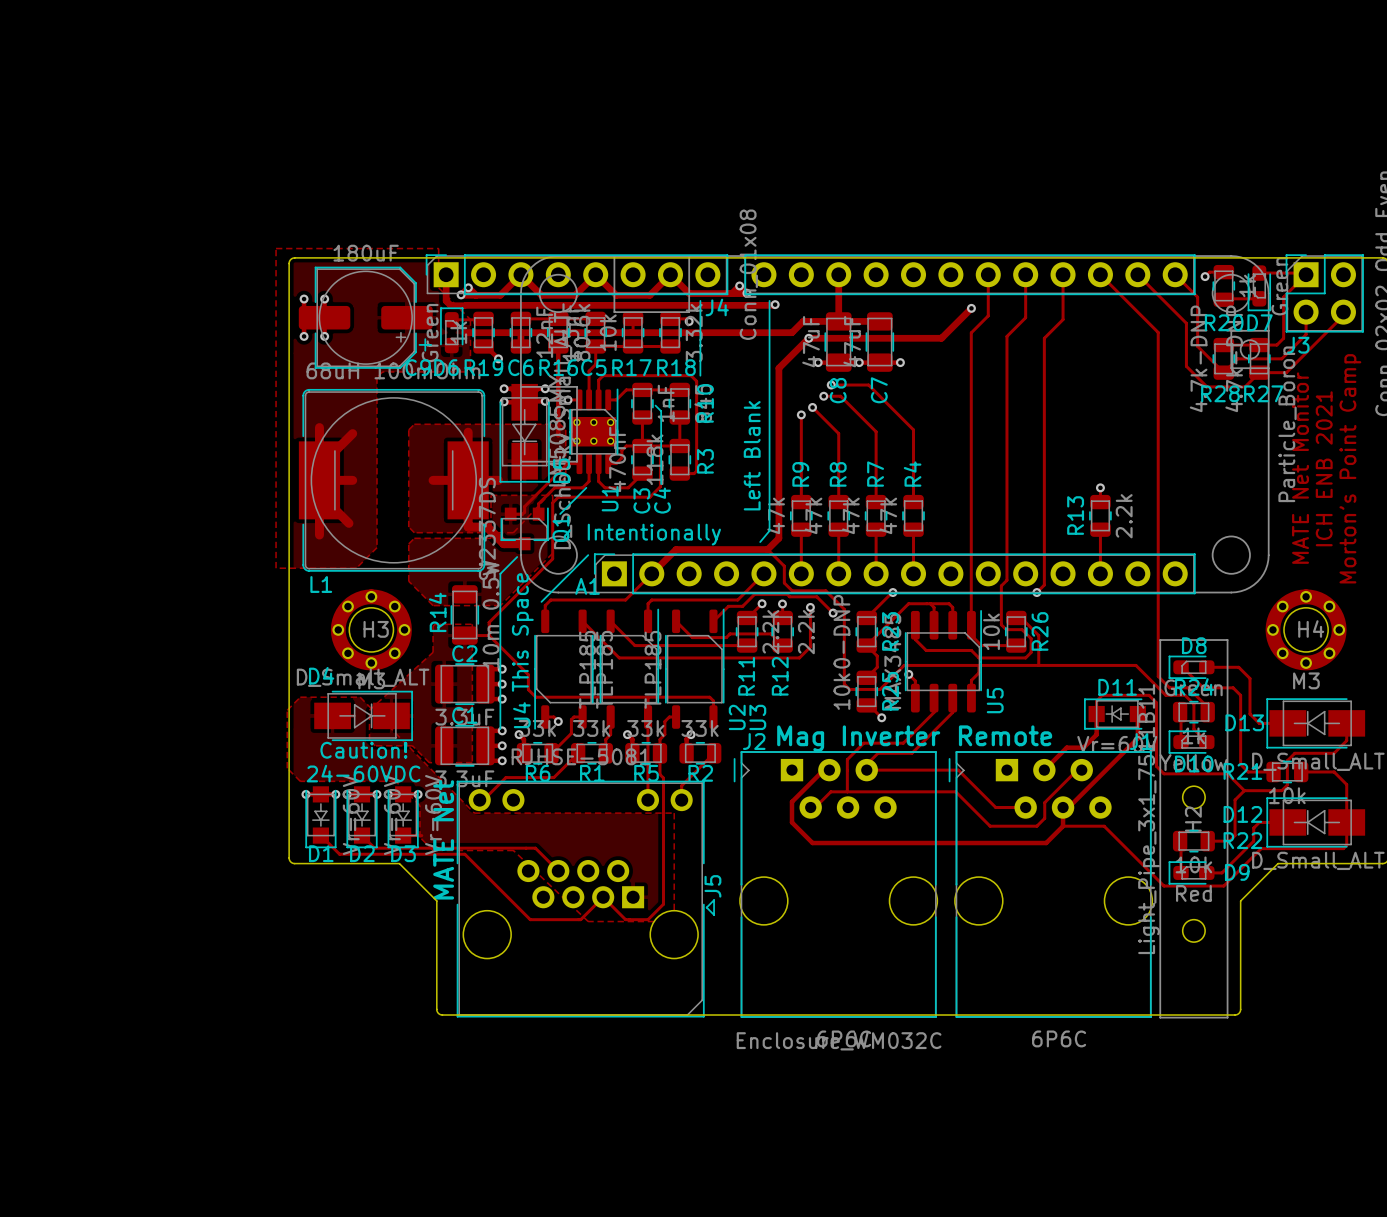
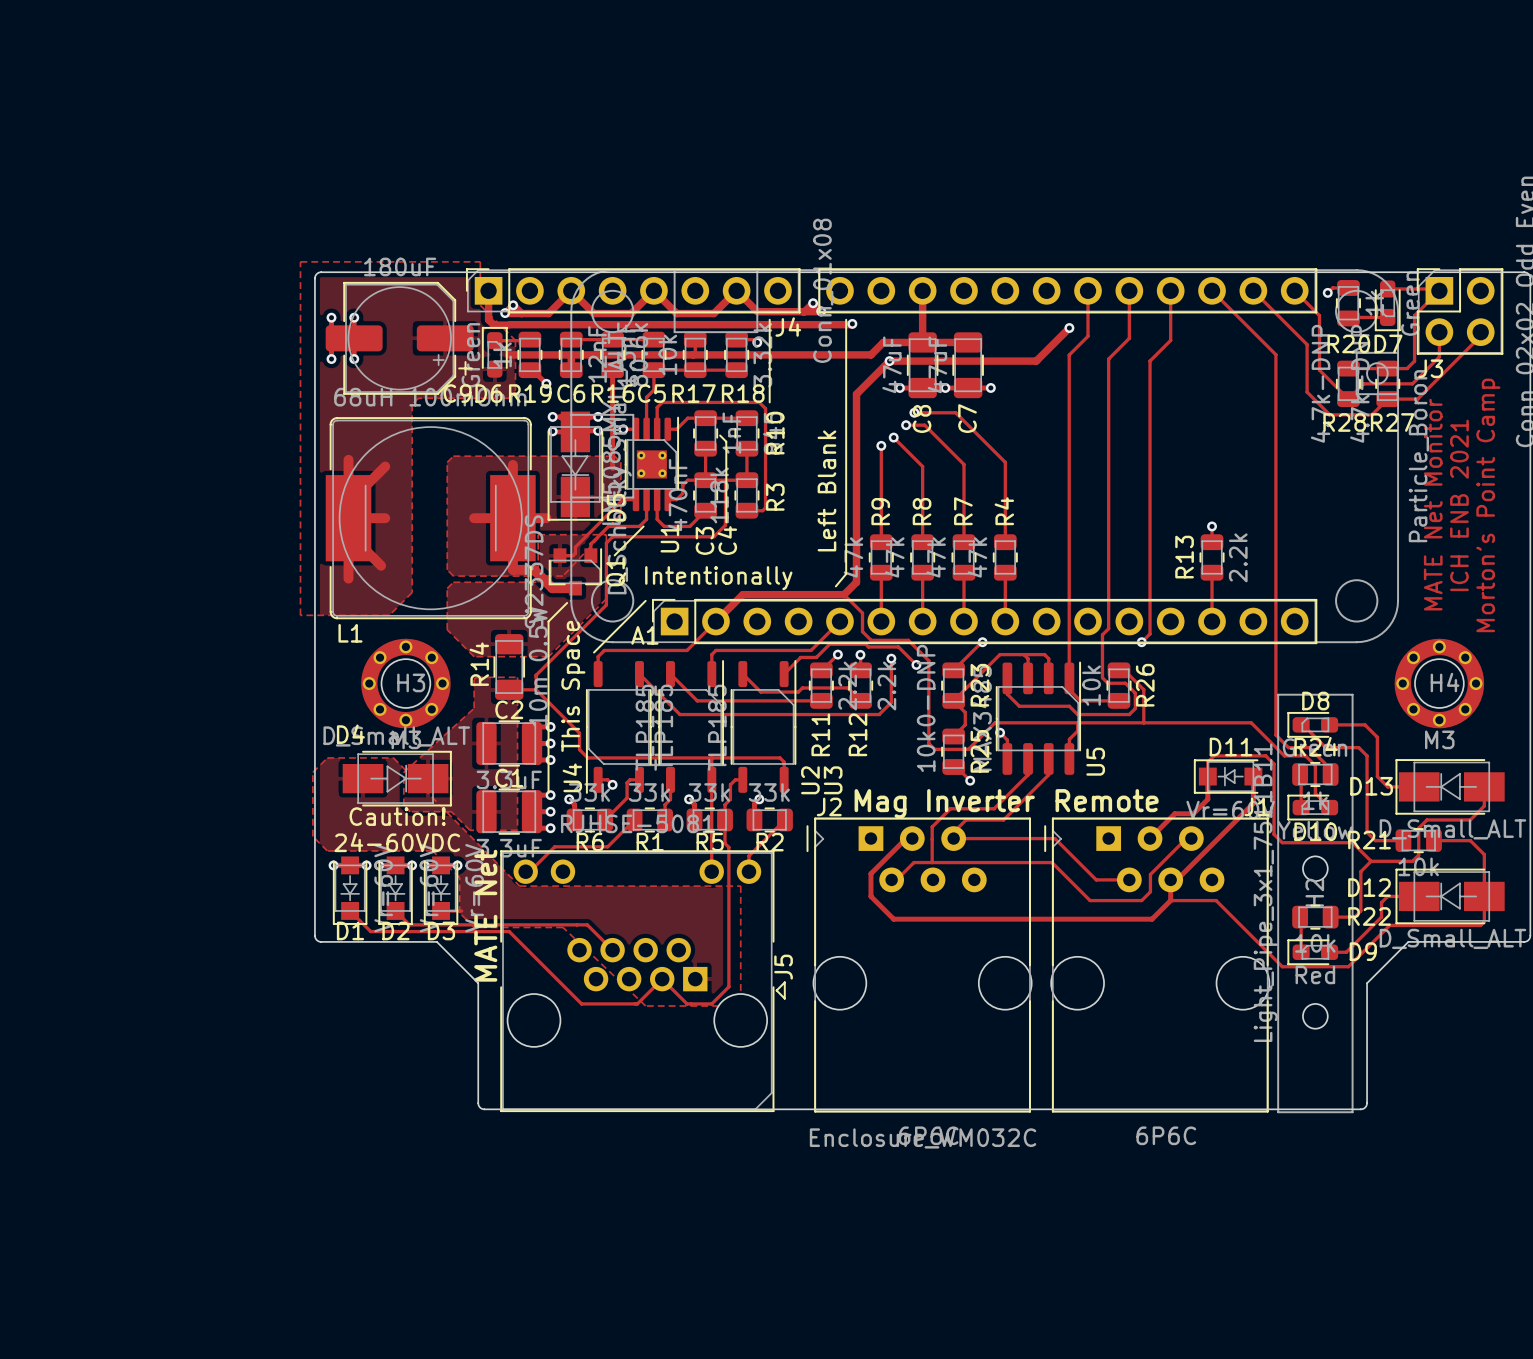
U1 footprint: [569, 388, 619, 475] -> [624, 416, 680, 512]

